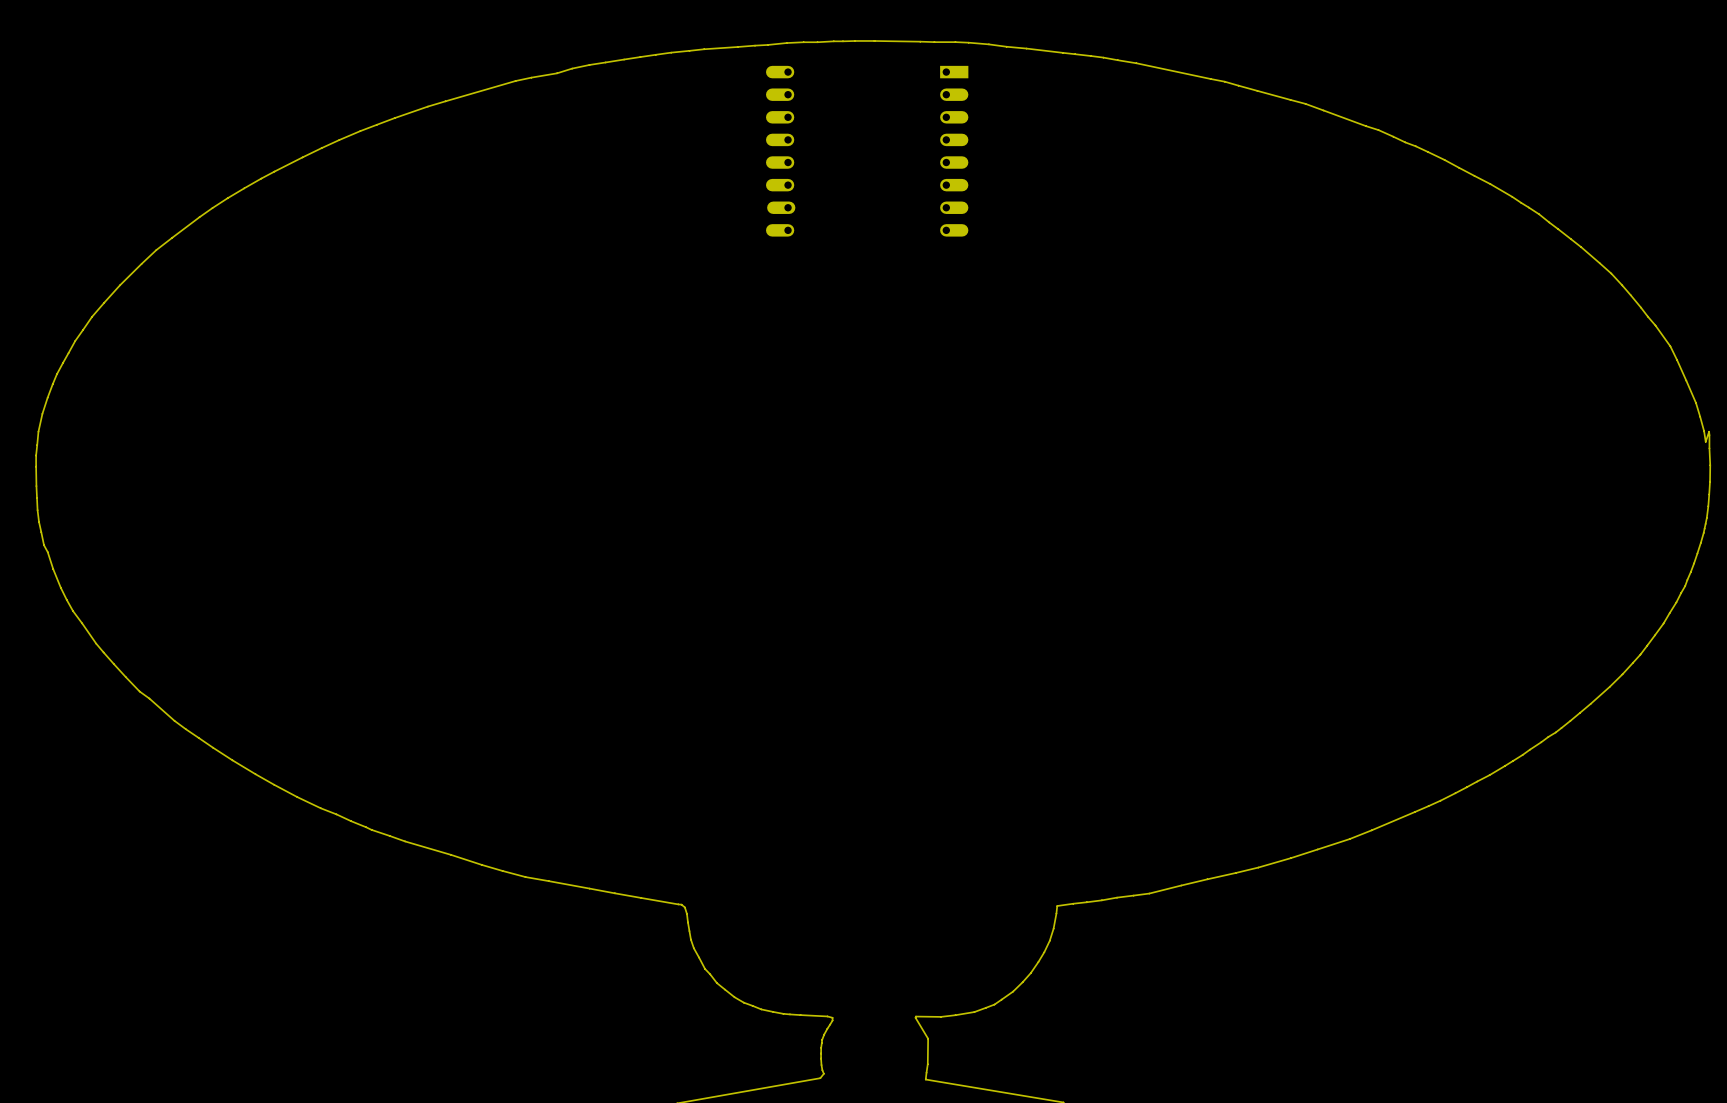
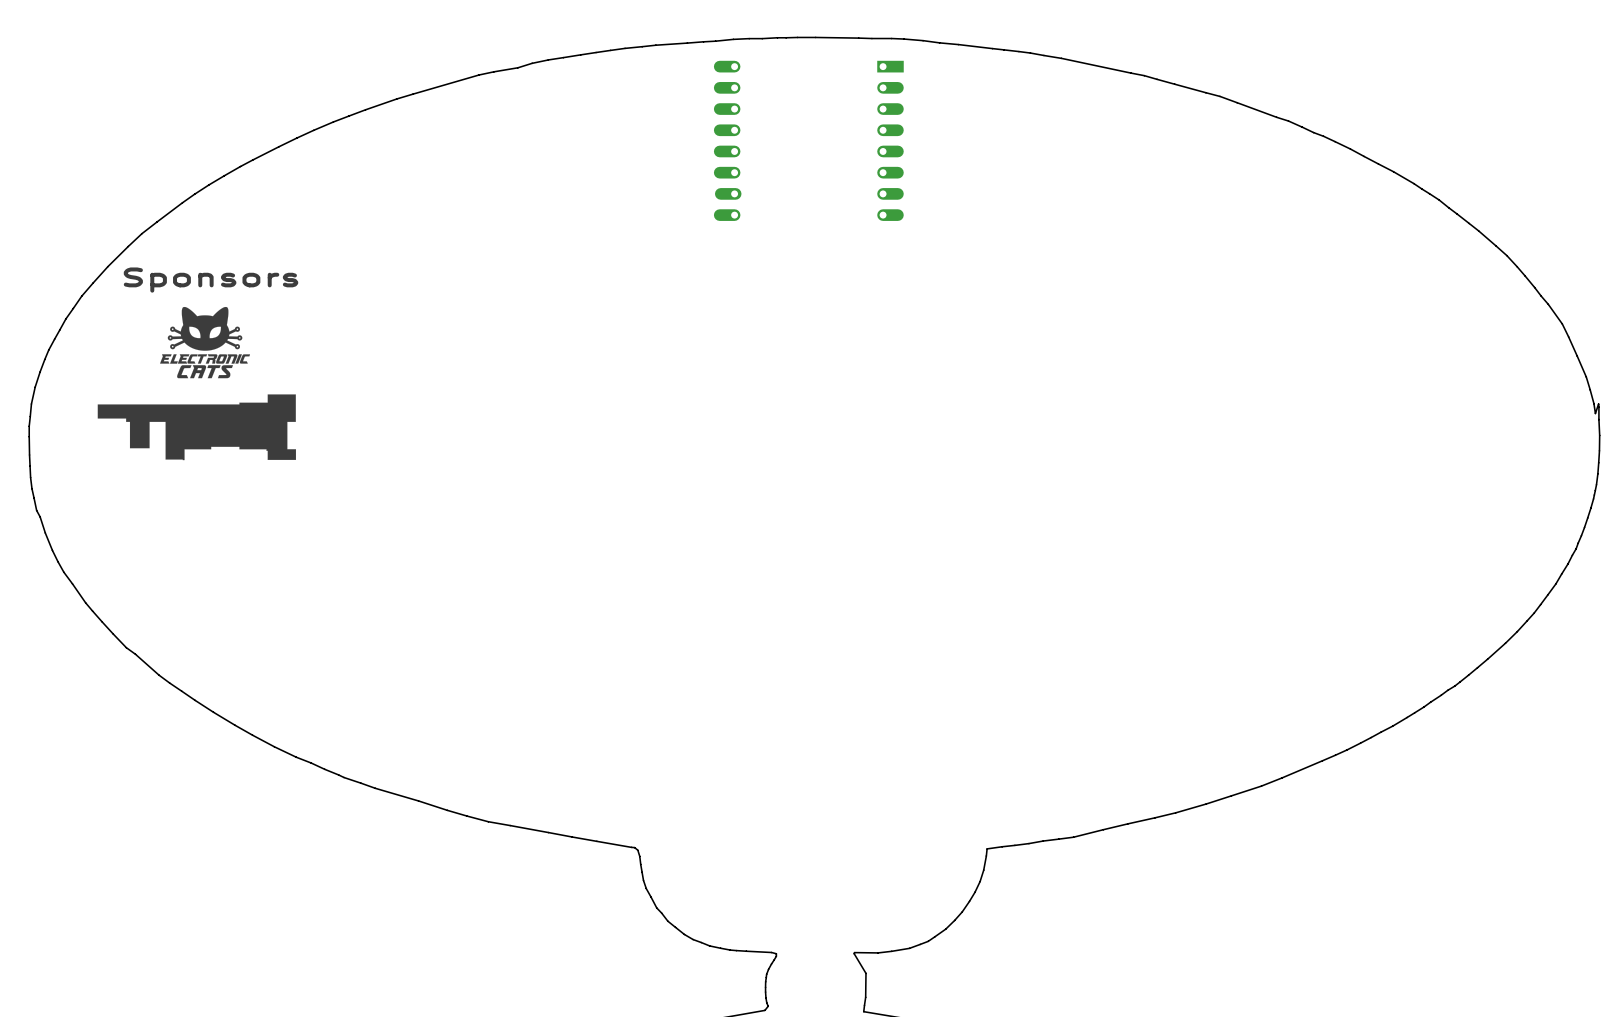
text: none -> Sponsors (211, 280)
drawing: none -> [160, 306, 251, 379]
drawing: none -> [97, 394, 297, 461]

